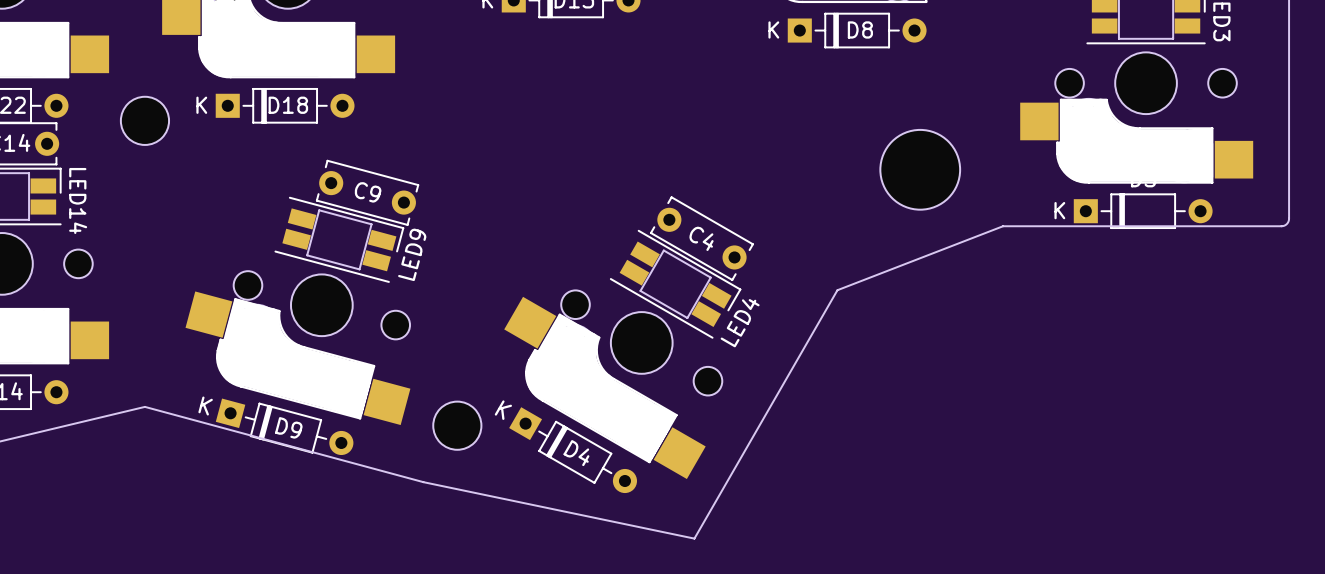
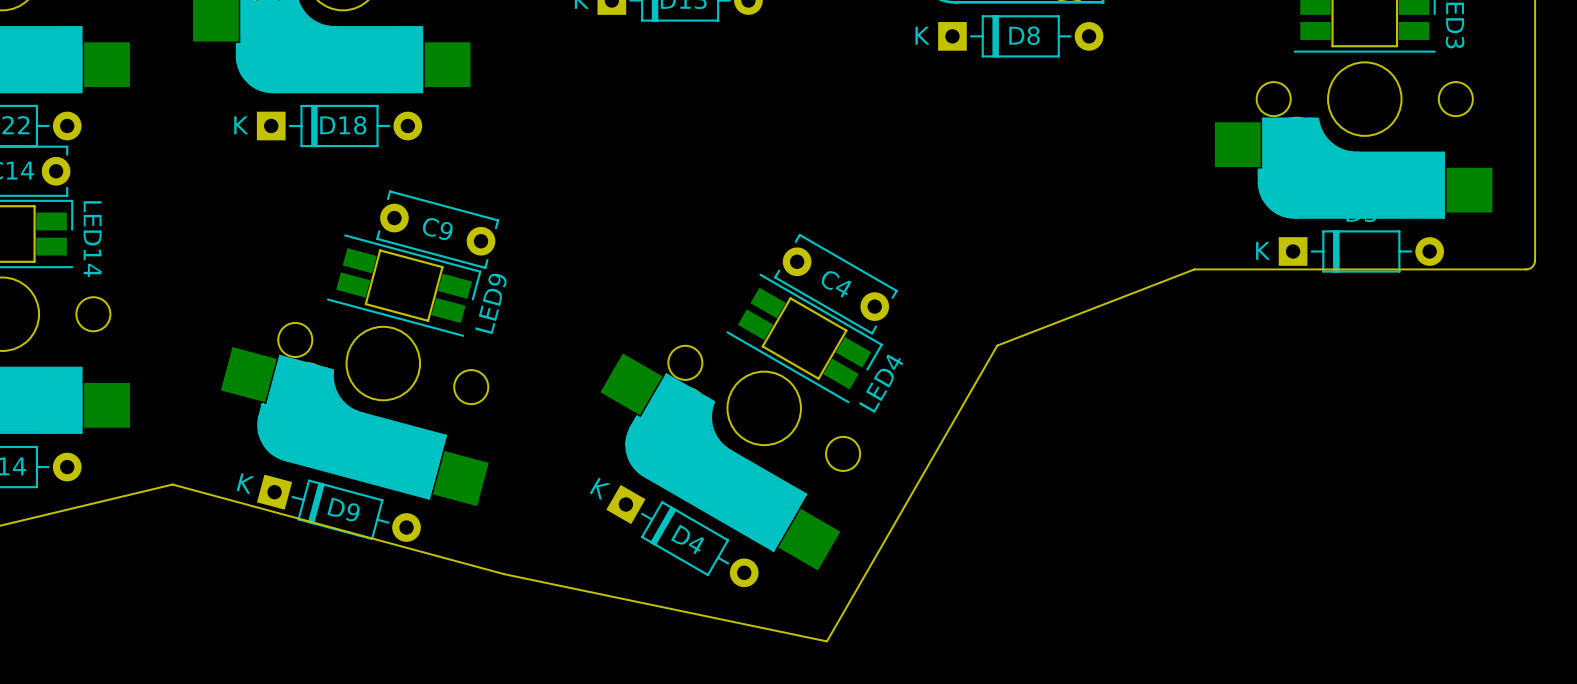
part: (144, 120) -> none
part: (920, 169) -> none
part: (457, 425) -> none

